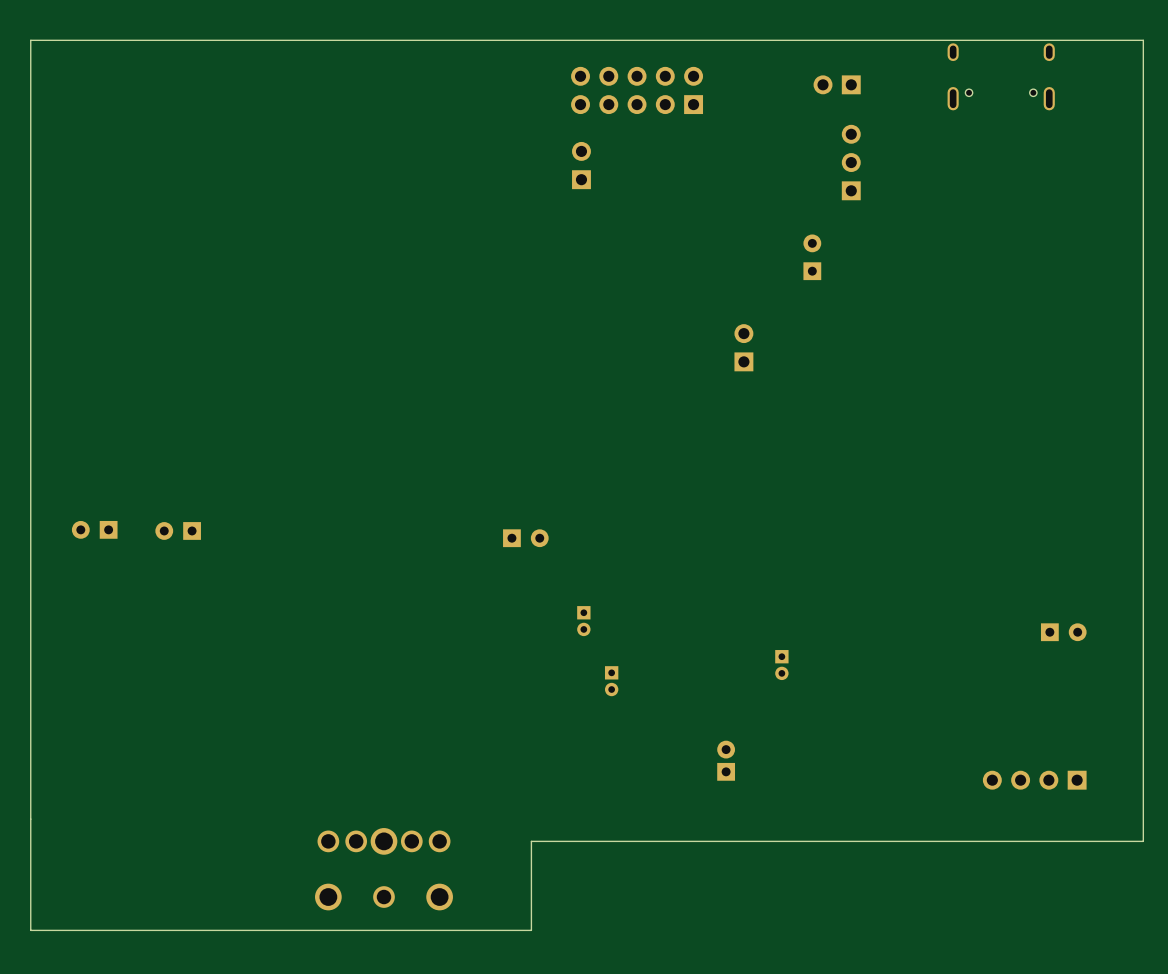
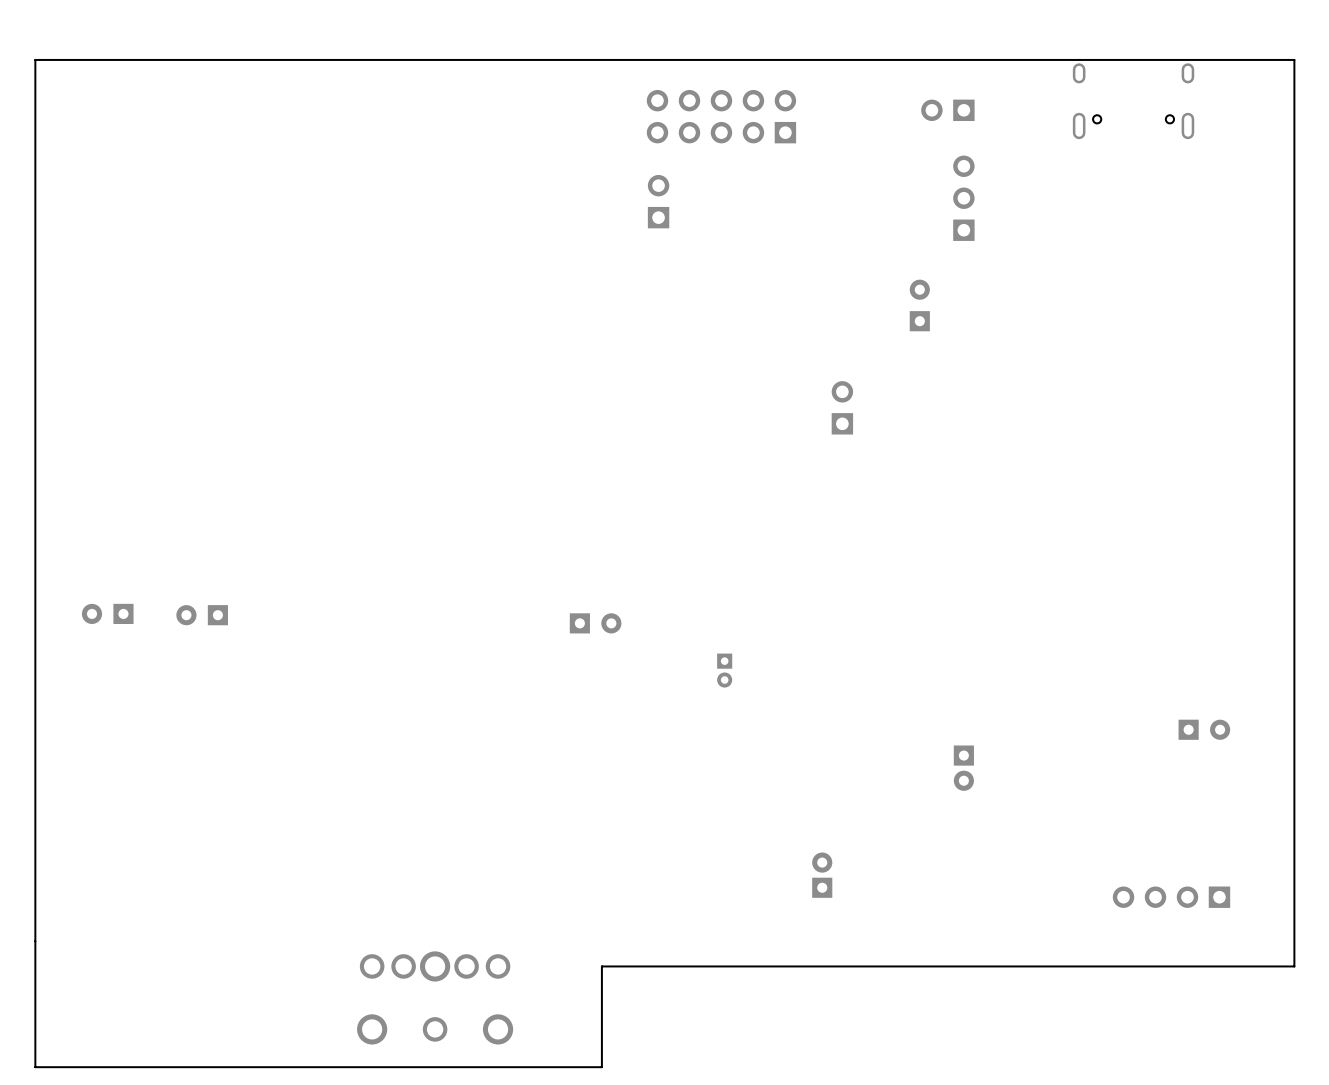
part: none -> (724, 670)
part: (583, 621) -> none
part: (781, 665) -> none
part: none -> (963, 768)
part: (611, 681) -> none

